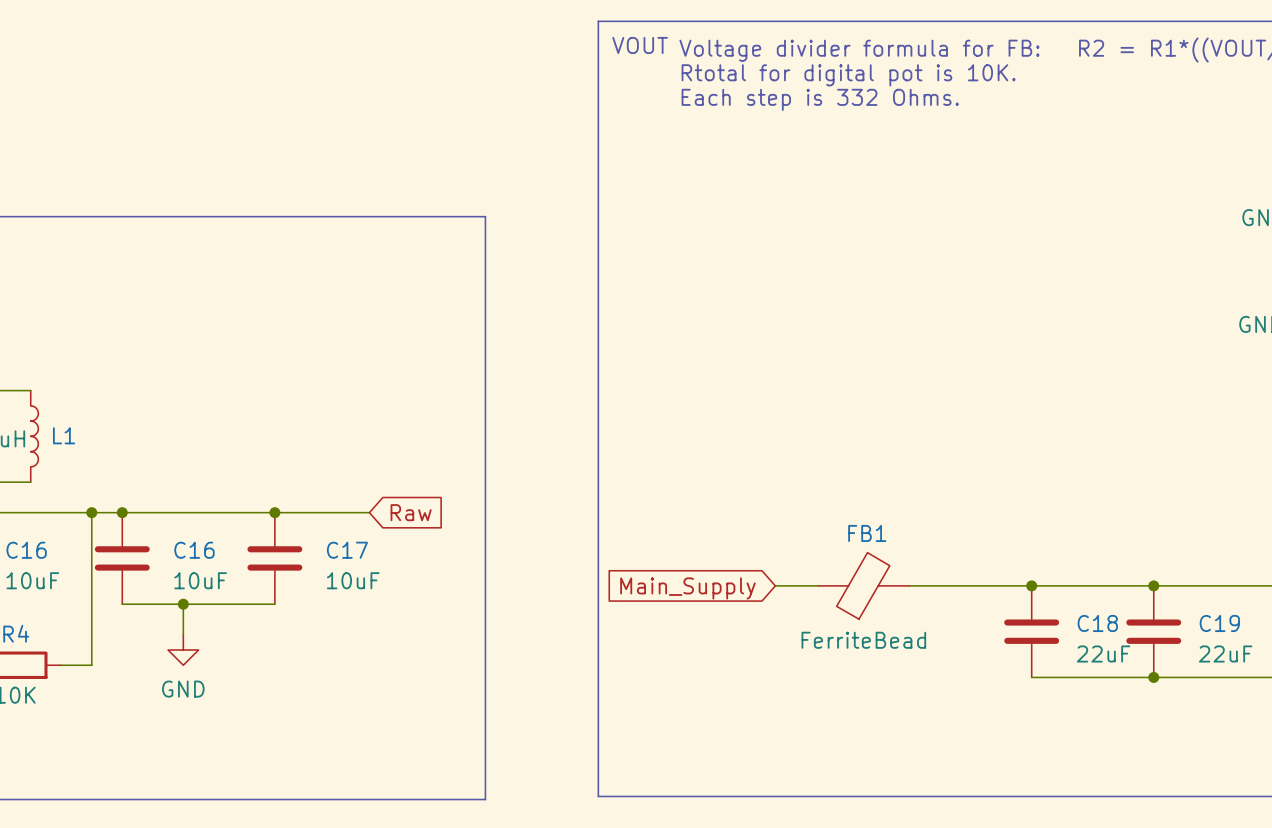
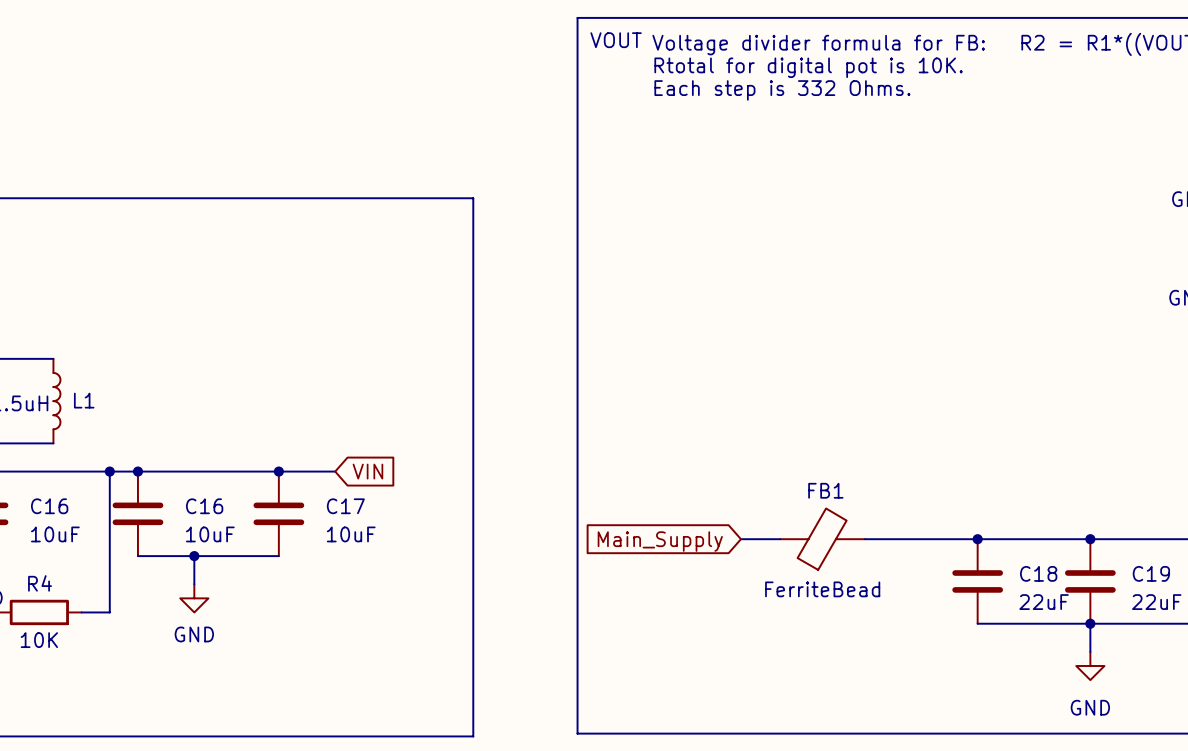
wire: (335, 512) (369, 512) -> none
global label: none -> VIN (367, 471)
global label: Raw (411, 512) -> none
wire: none -> (1090, 623) (1090, 651)
power symbol: none -> GND (1090, 665)

